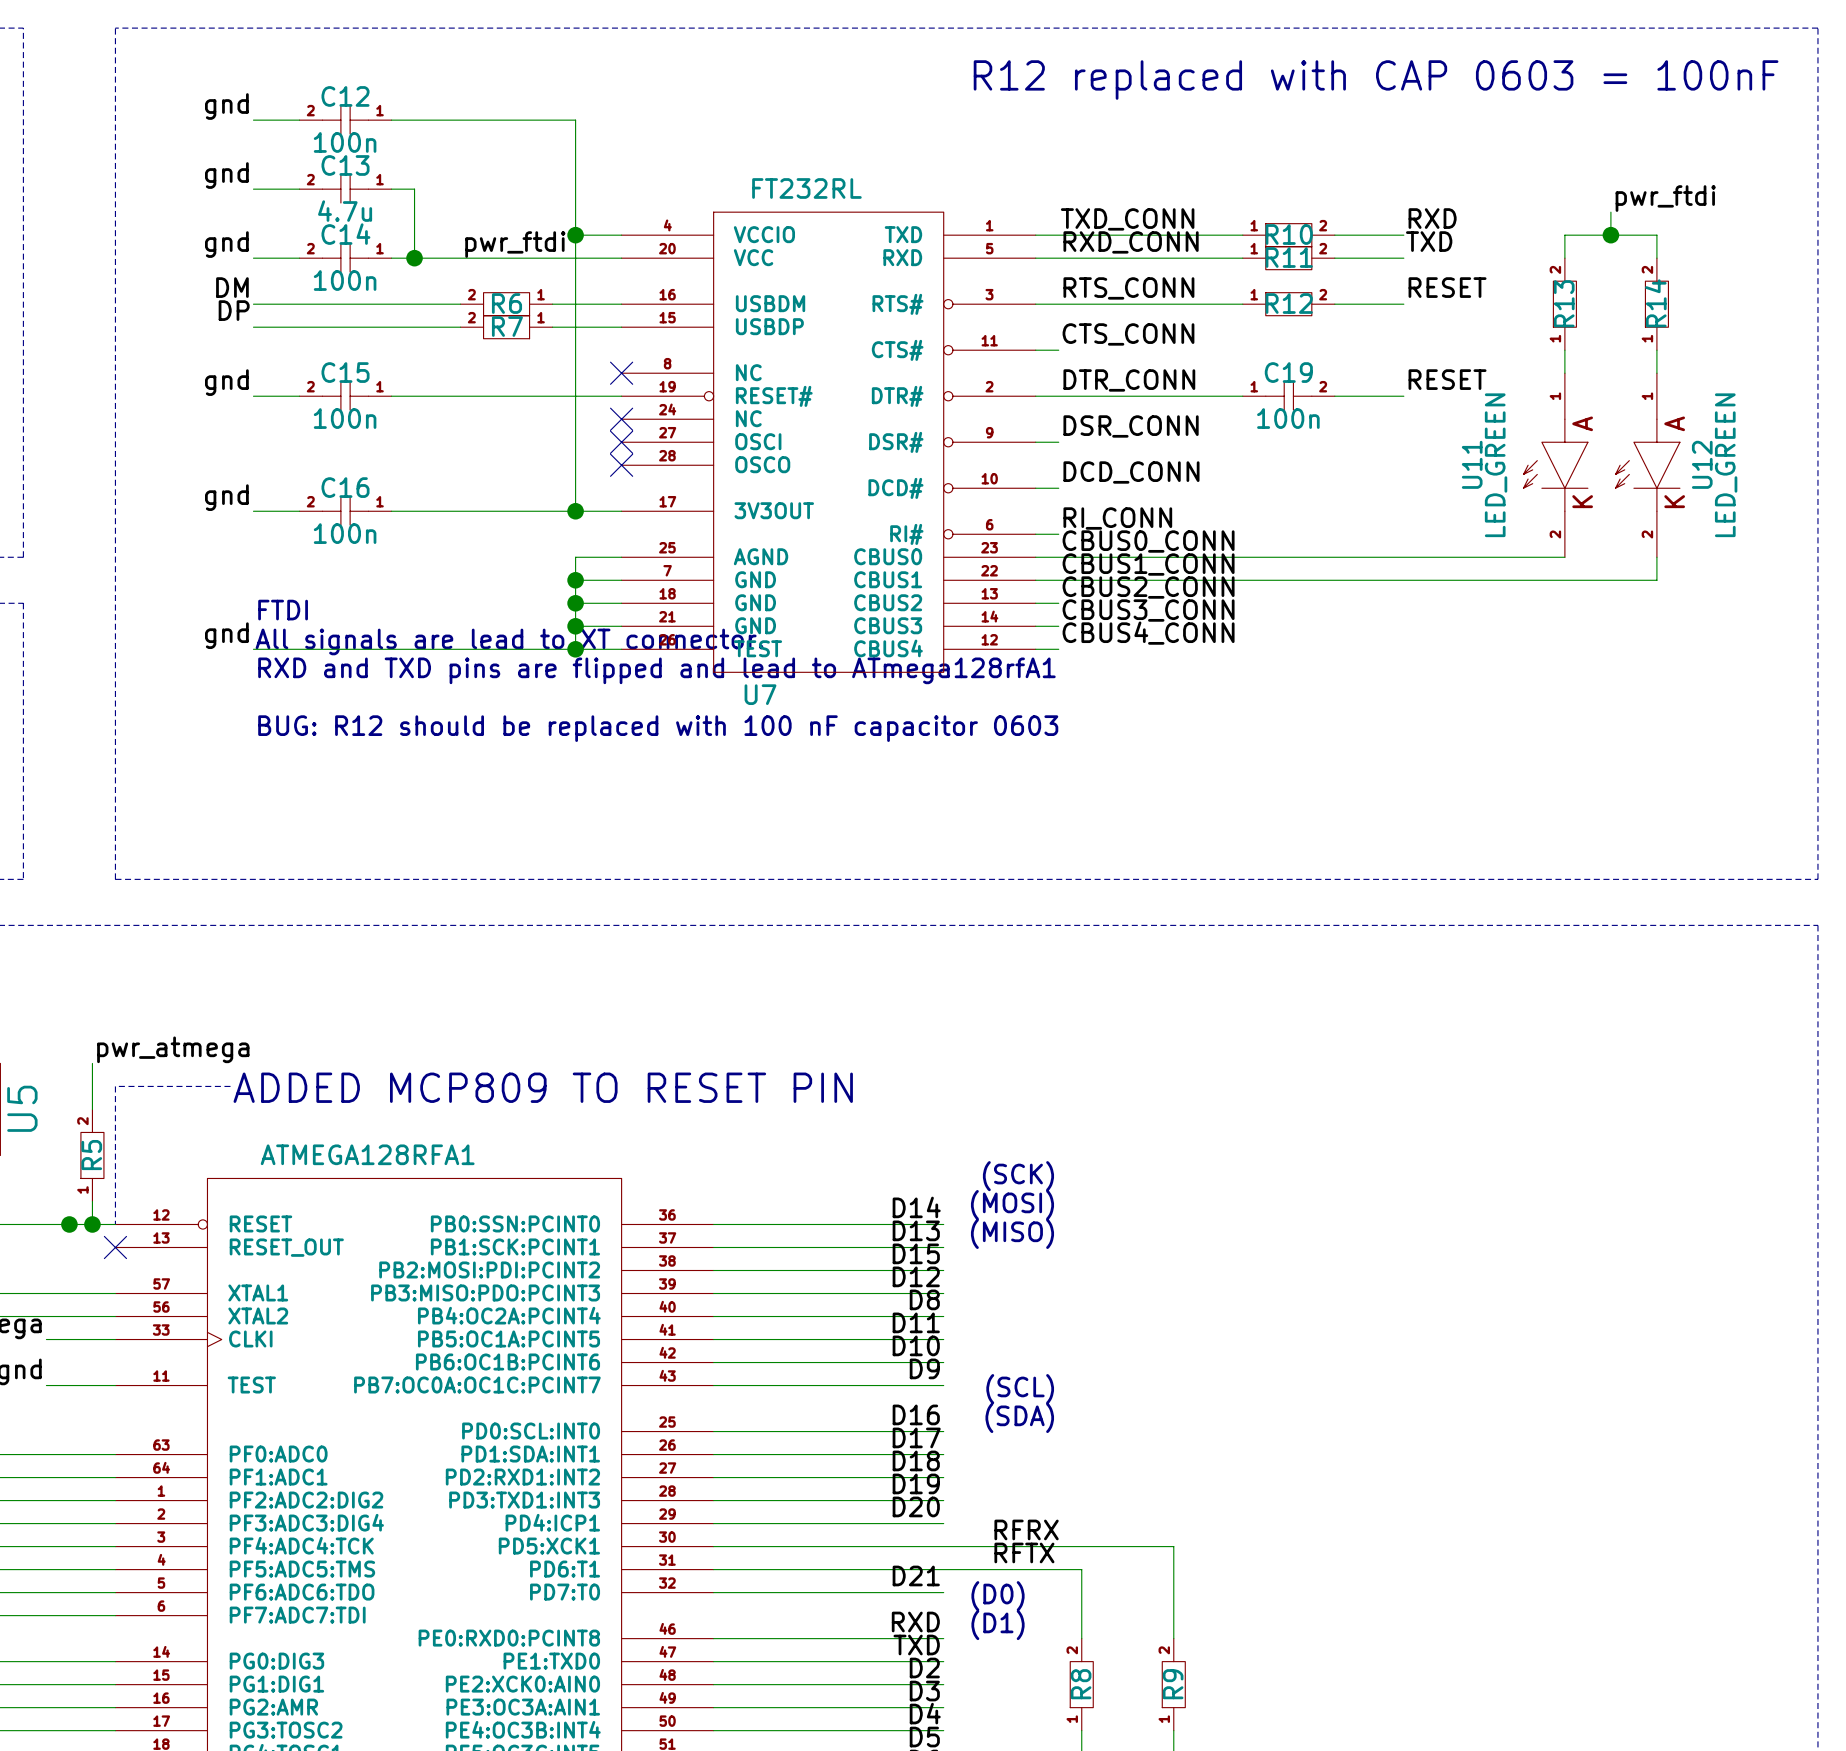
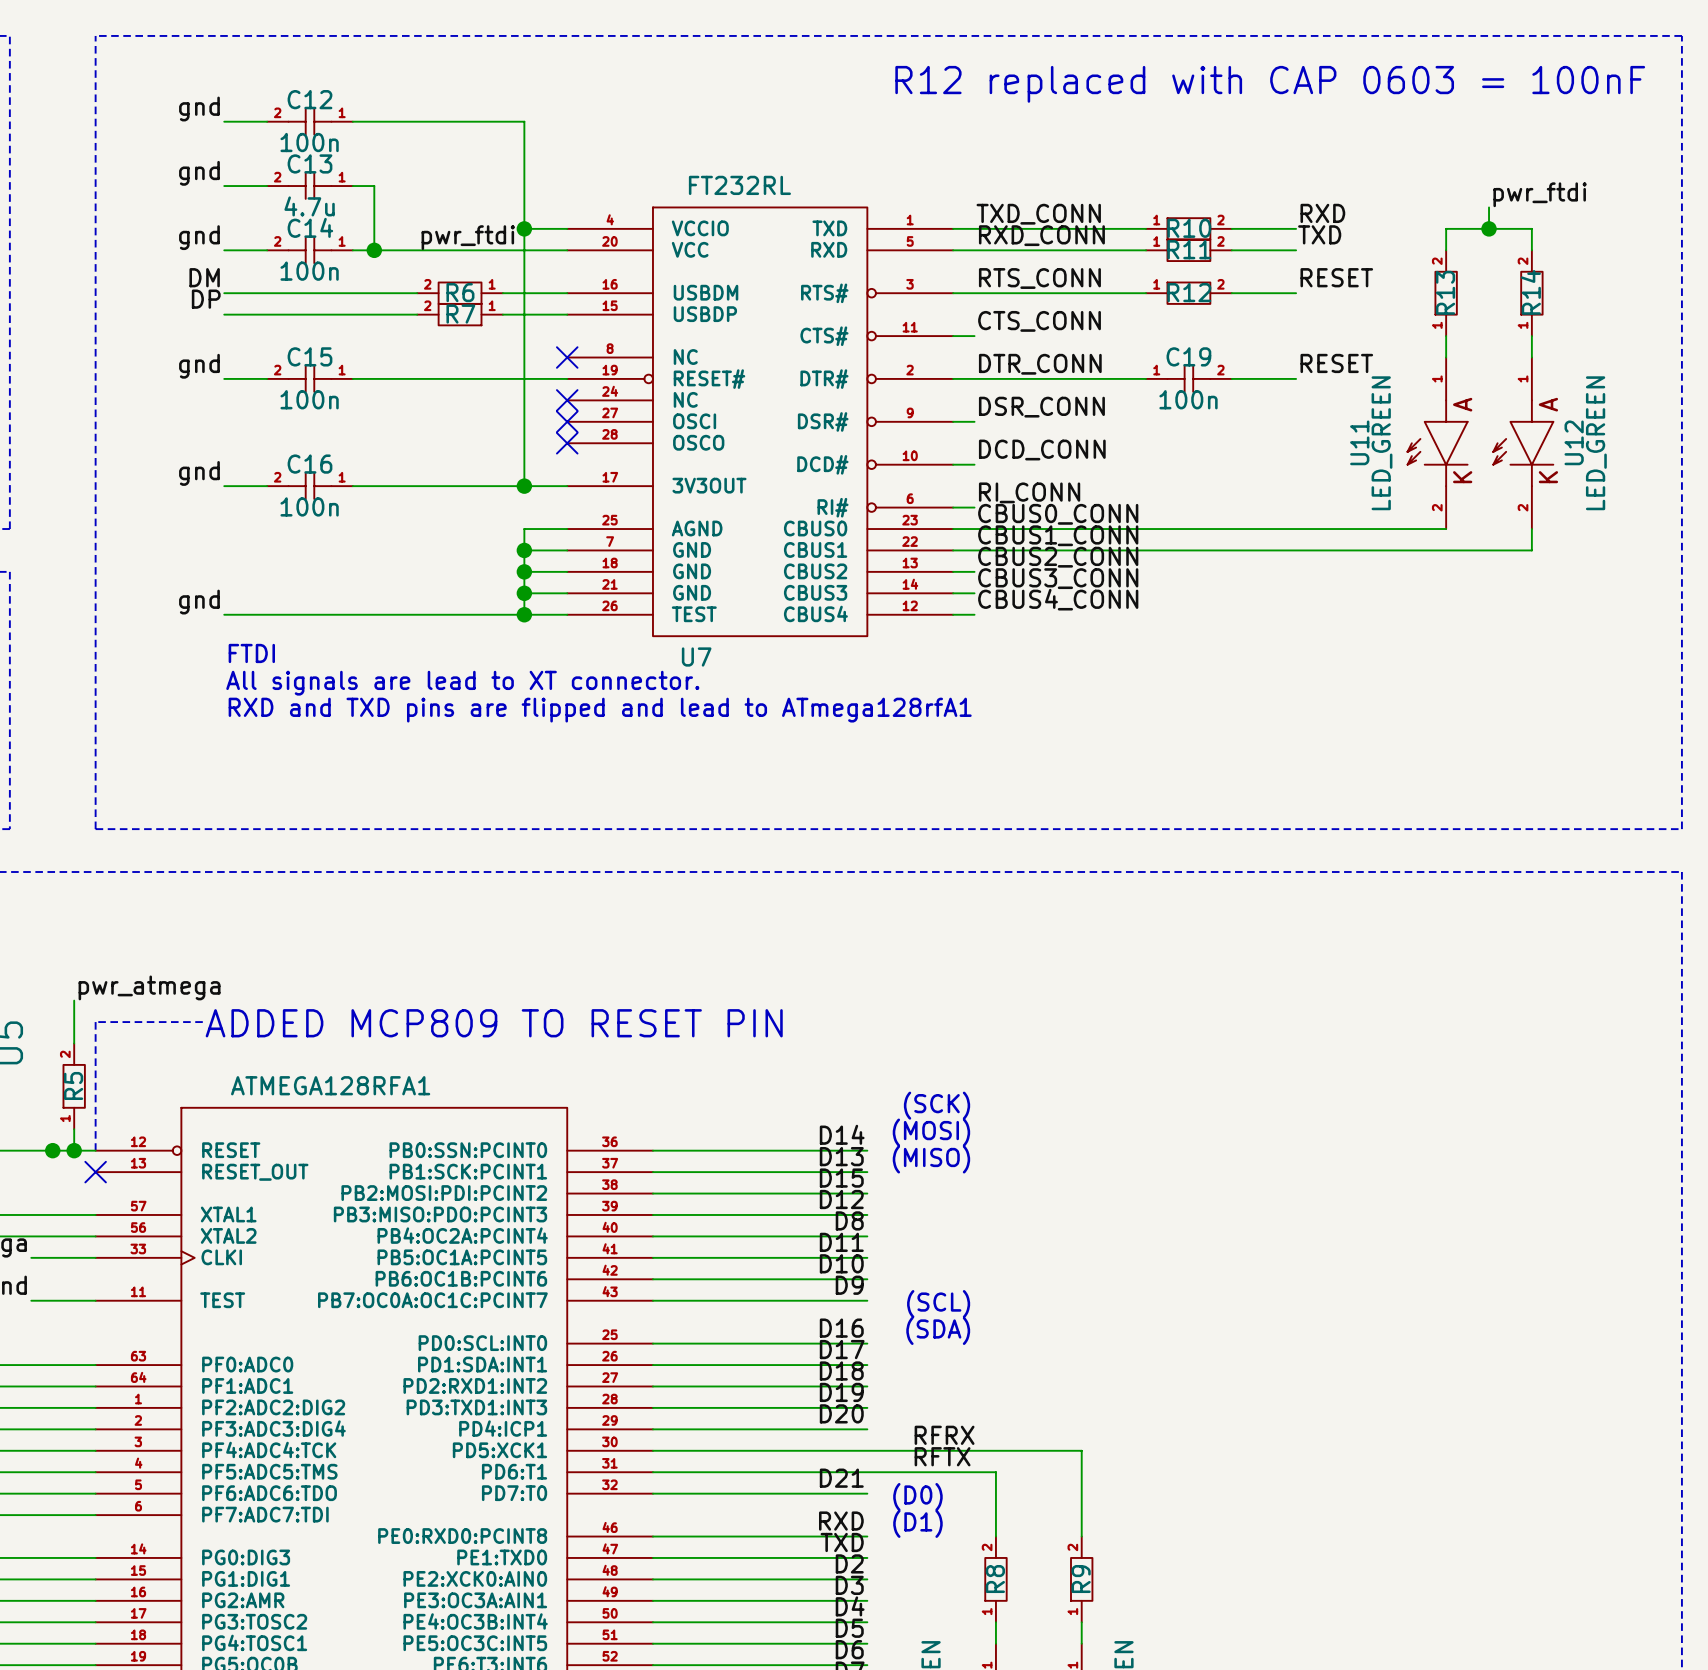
text position: FTDI (283, 610) -> FTDI (251, 653)
text: All signals are lead to XT connector. (509, 641) -> none
text position: RXD and TXD pins are flipped and lead to ATmega128rfA1 (656, 670) -> RXD and TXD pins are flipped and lead to ATmega128rfA1 (600, 710)
text: BUG: R12 should be replaced with 100 nF capacitor 0603 (658, 728) -> All signals are lead to XT connector. (462, 683)

